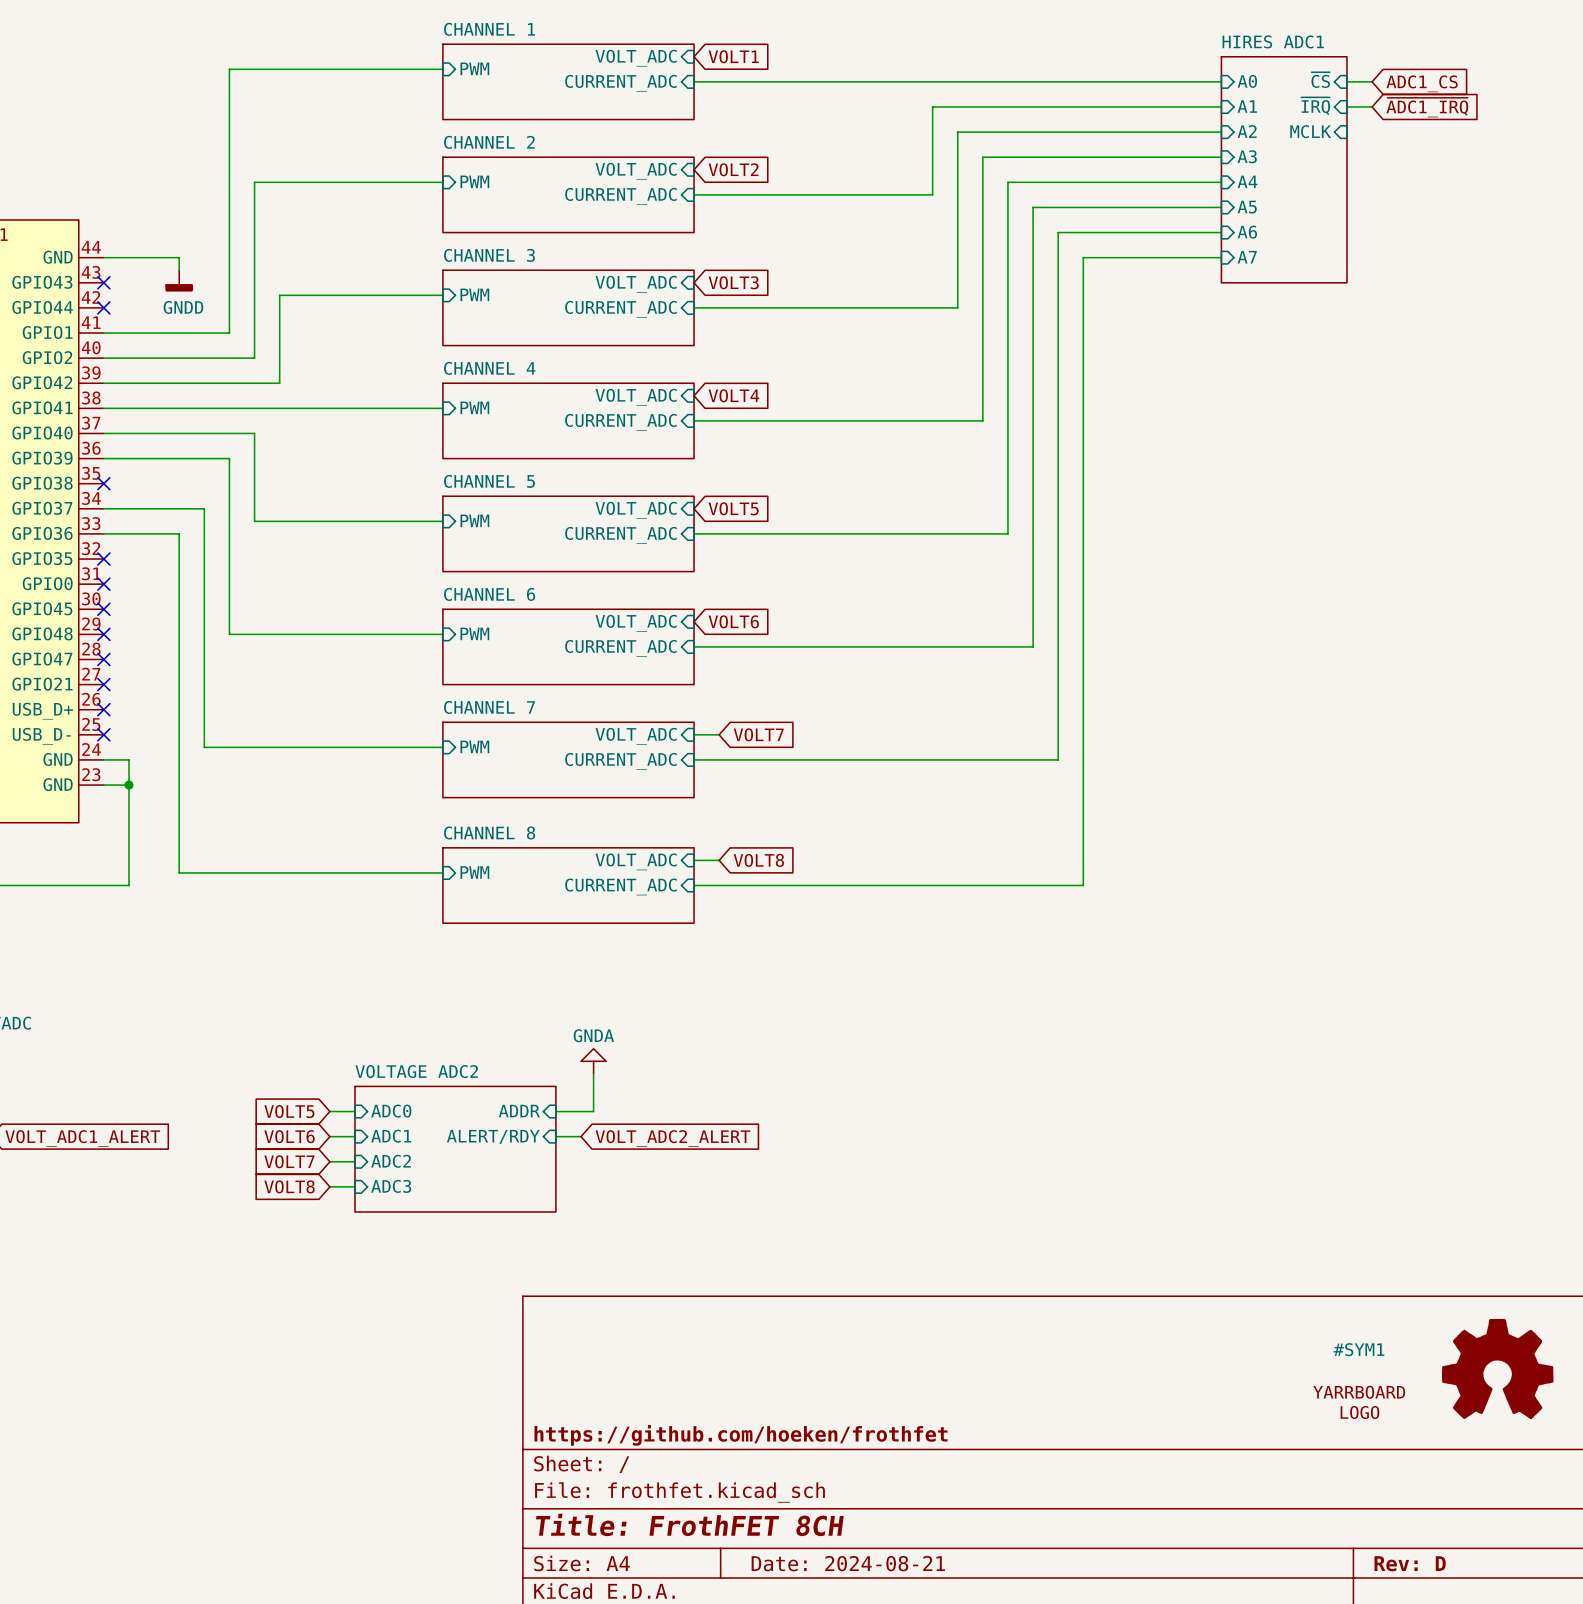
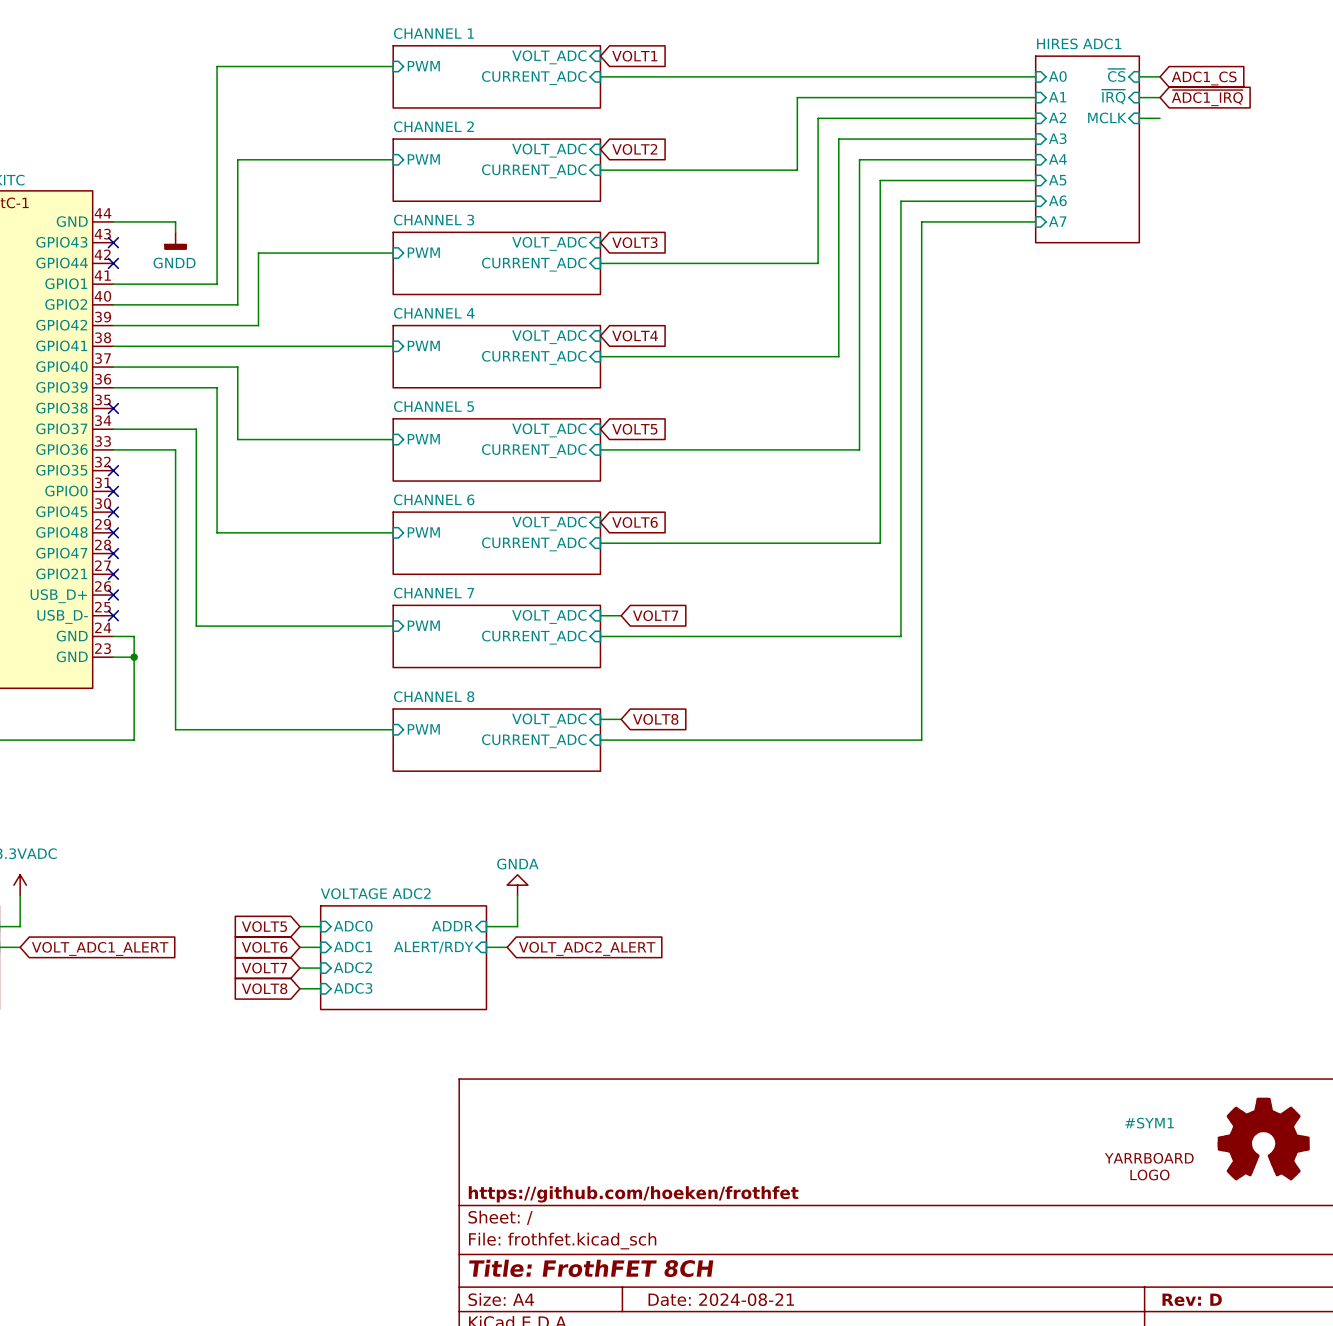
wire: none -> (1139, 118) (1160, 118)

